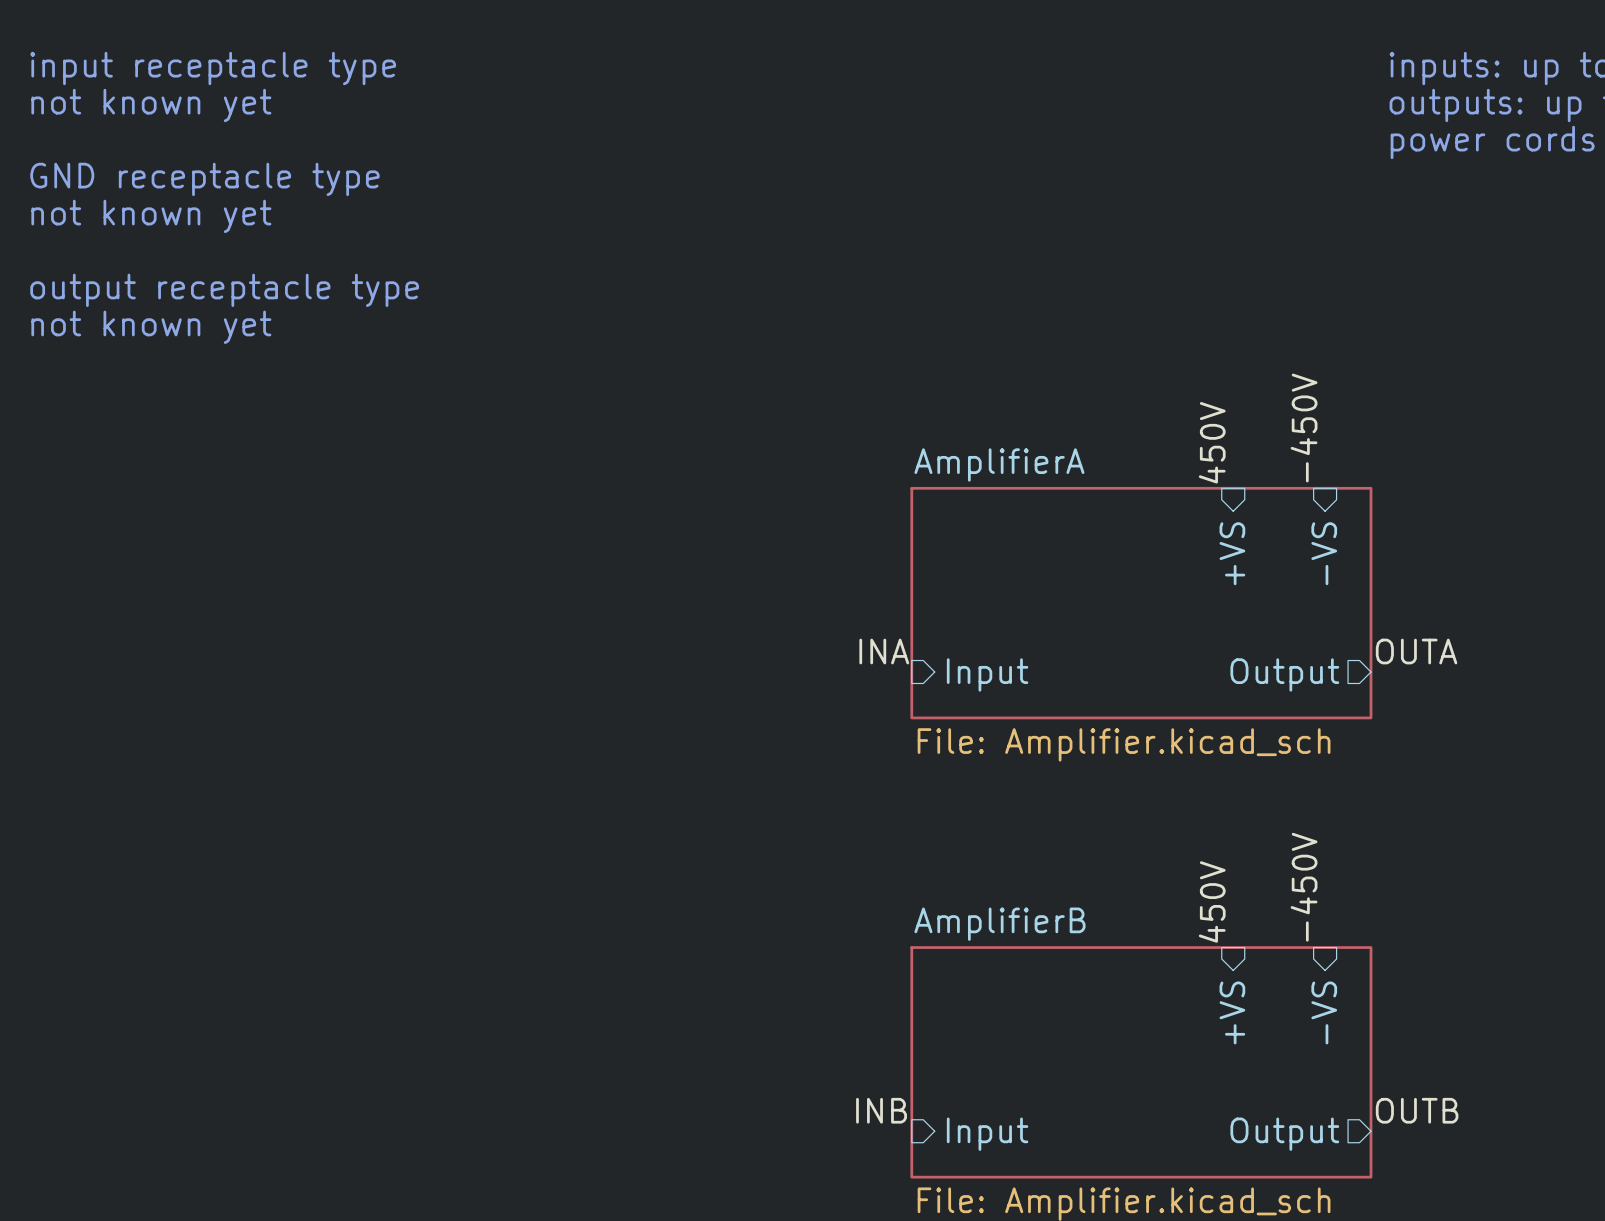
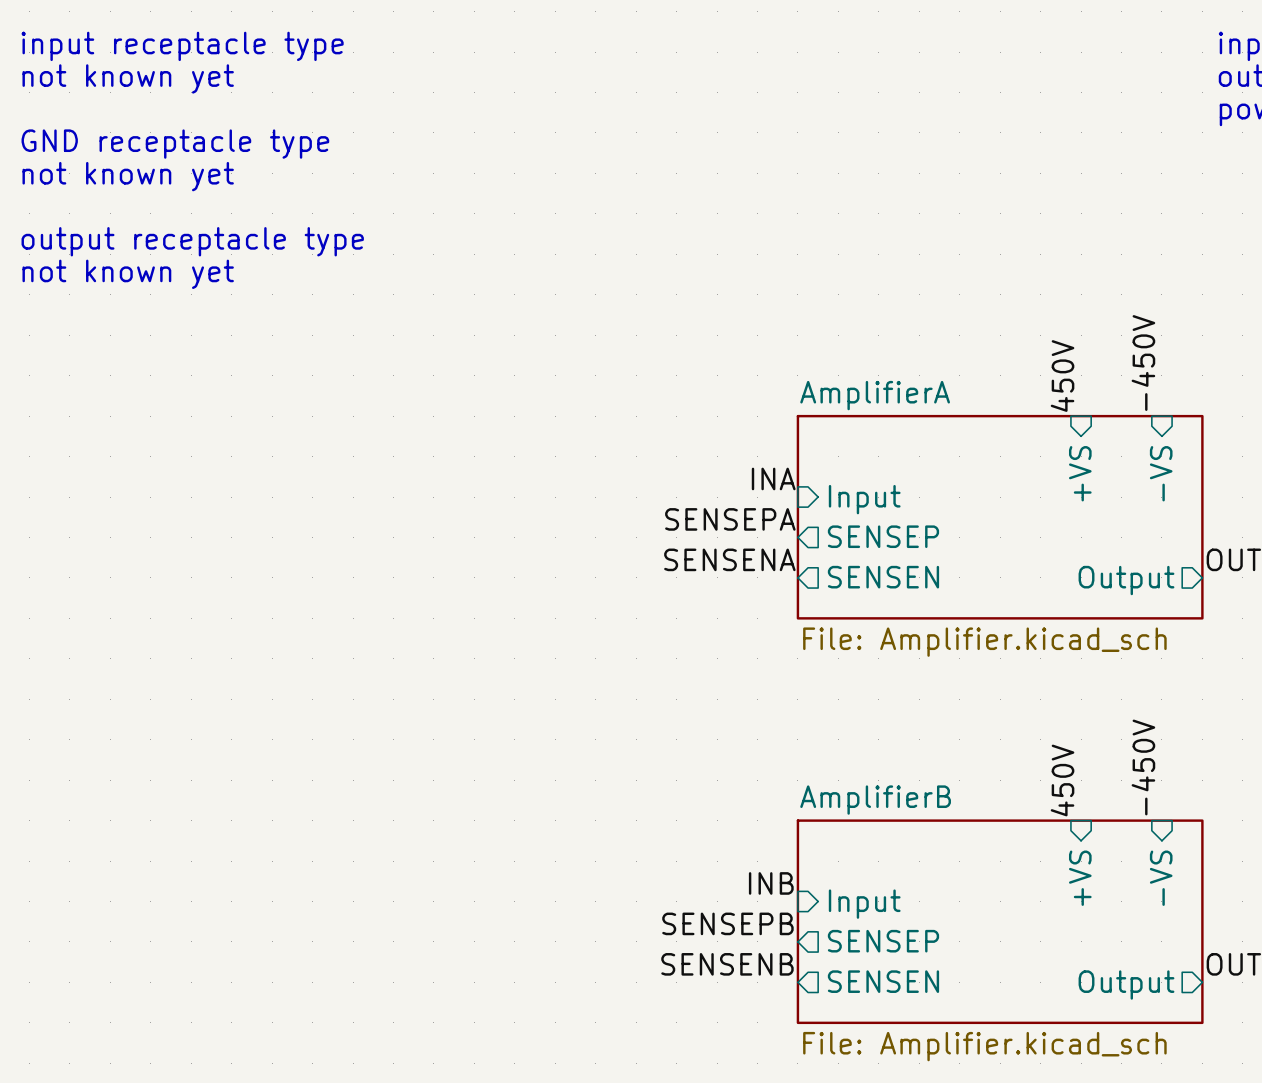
label: none -> INA (773, 478)
sheet pin: none -> Input (864, 499)
label: none -> SENSEPA (730, 519)
sheet pin: none -> SENSEP (883, 536)
label: INA (884, 651) -> SENSENA (729, 559)
sheet pin shape: input (987, 674) -> output (883, 577)
sheet pin: Input (987, 674) -> SENSEN (883, 577)
label: none -> INB (771, 883)
sheet pin: none -> Input (864, 904)
label: none -> SENSEPB (727, 923)
sheet pin: none -> SENSEP (883, 941)
label: INB (881, 1110) -> SENSENB (727, 964)
sheet pin shape: input (987, 1134) -> output (883, 981)
sheet pin: Input (987, 1134) -> SENSEN (883, 981)

